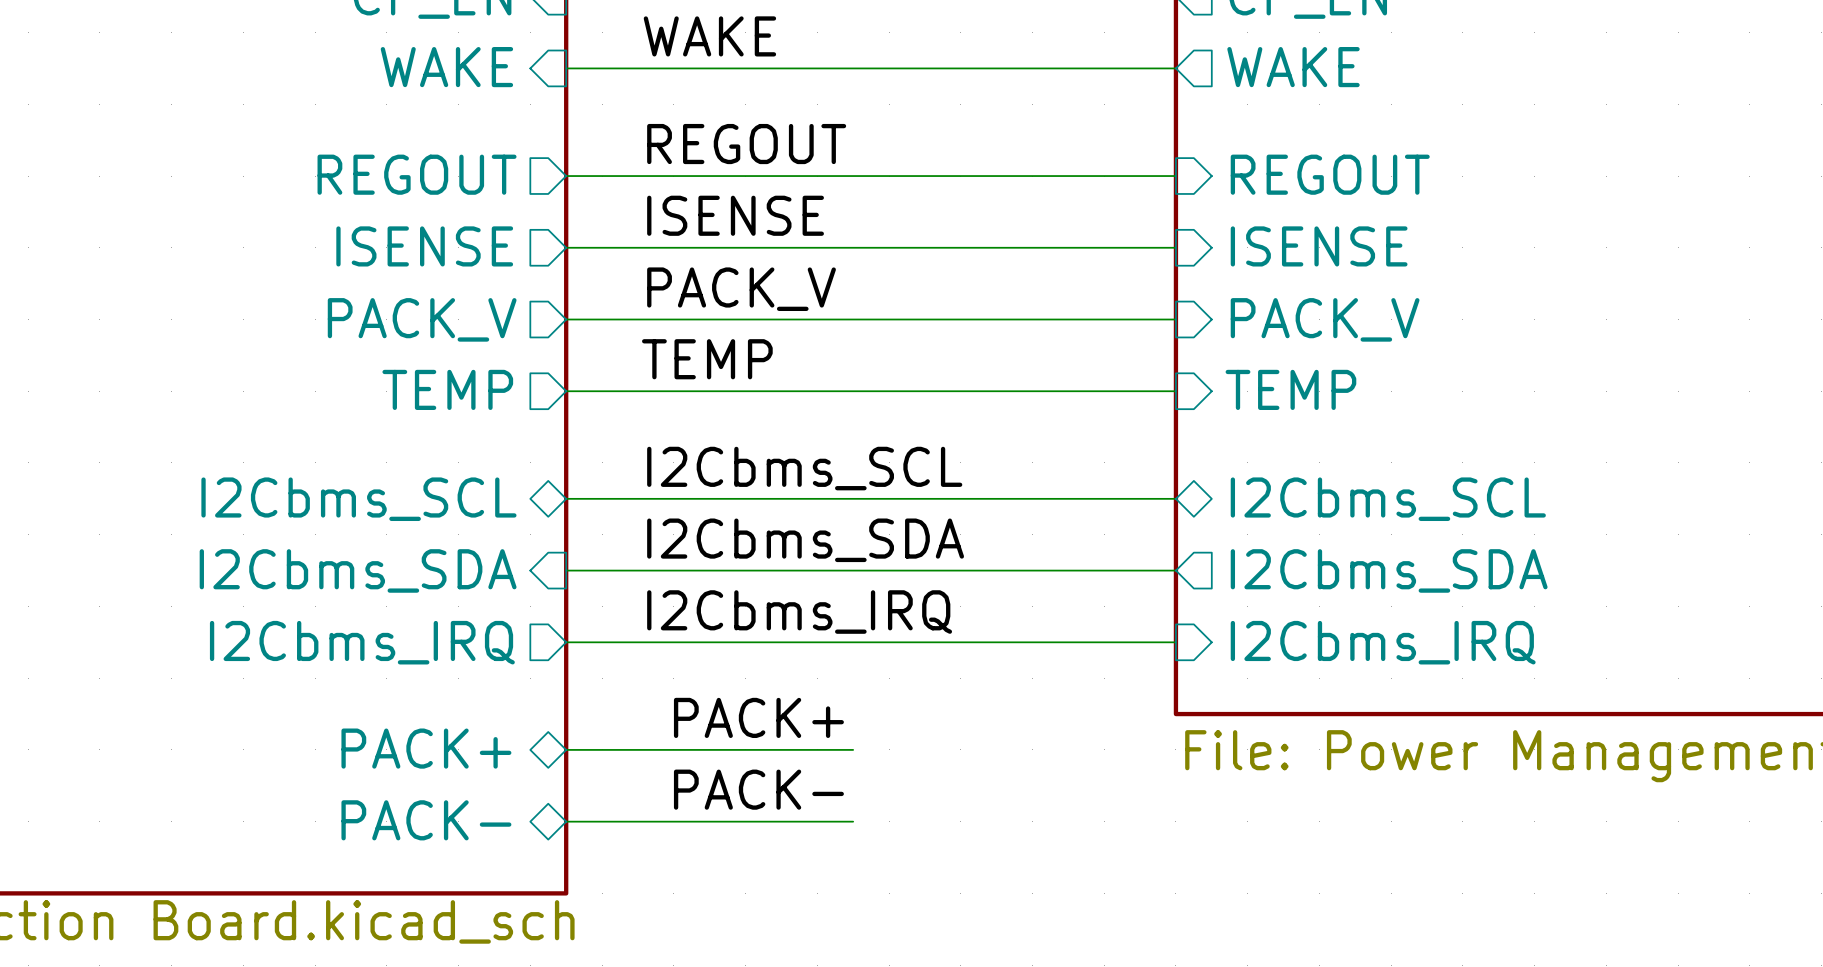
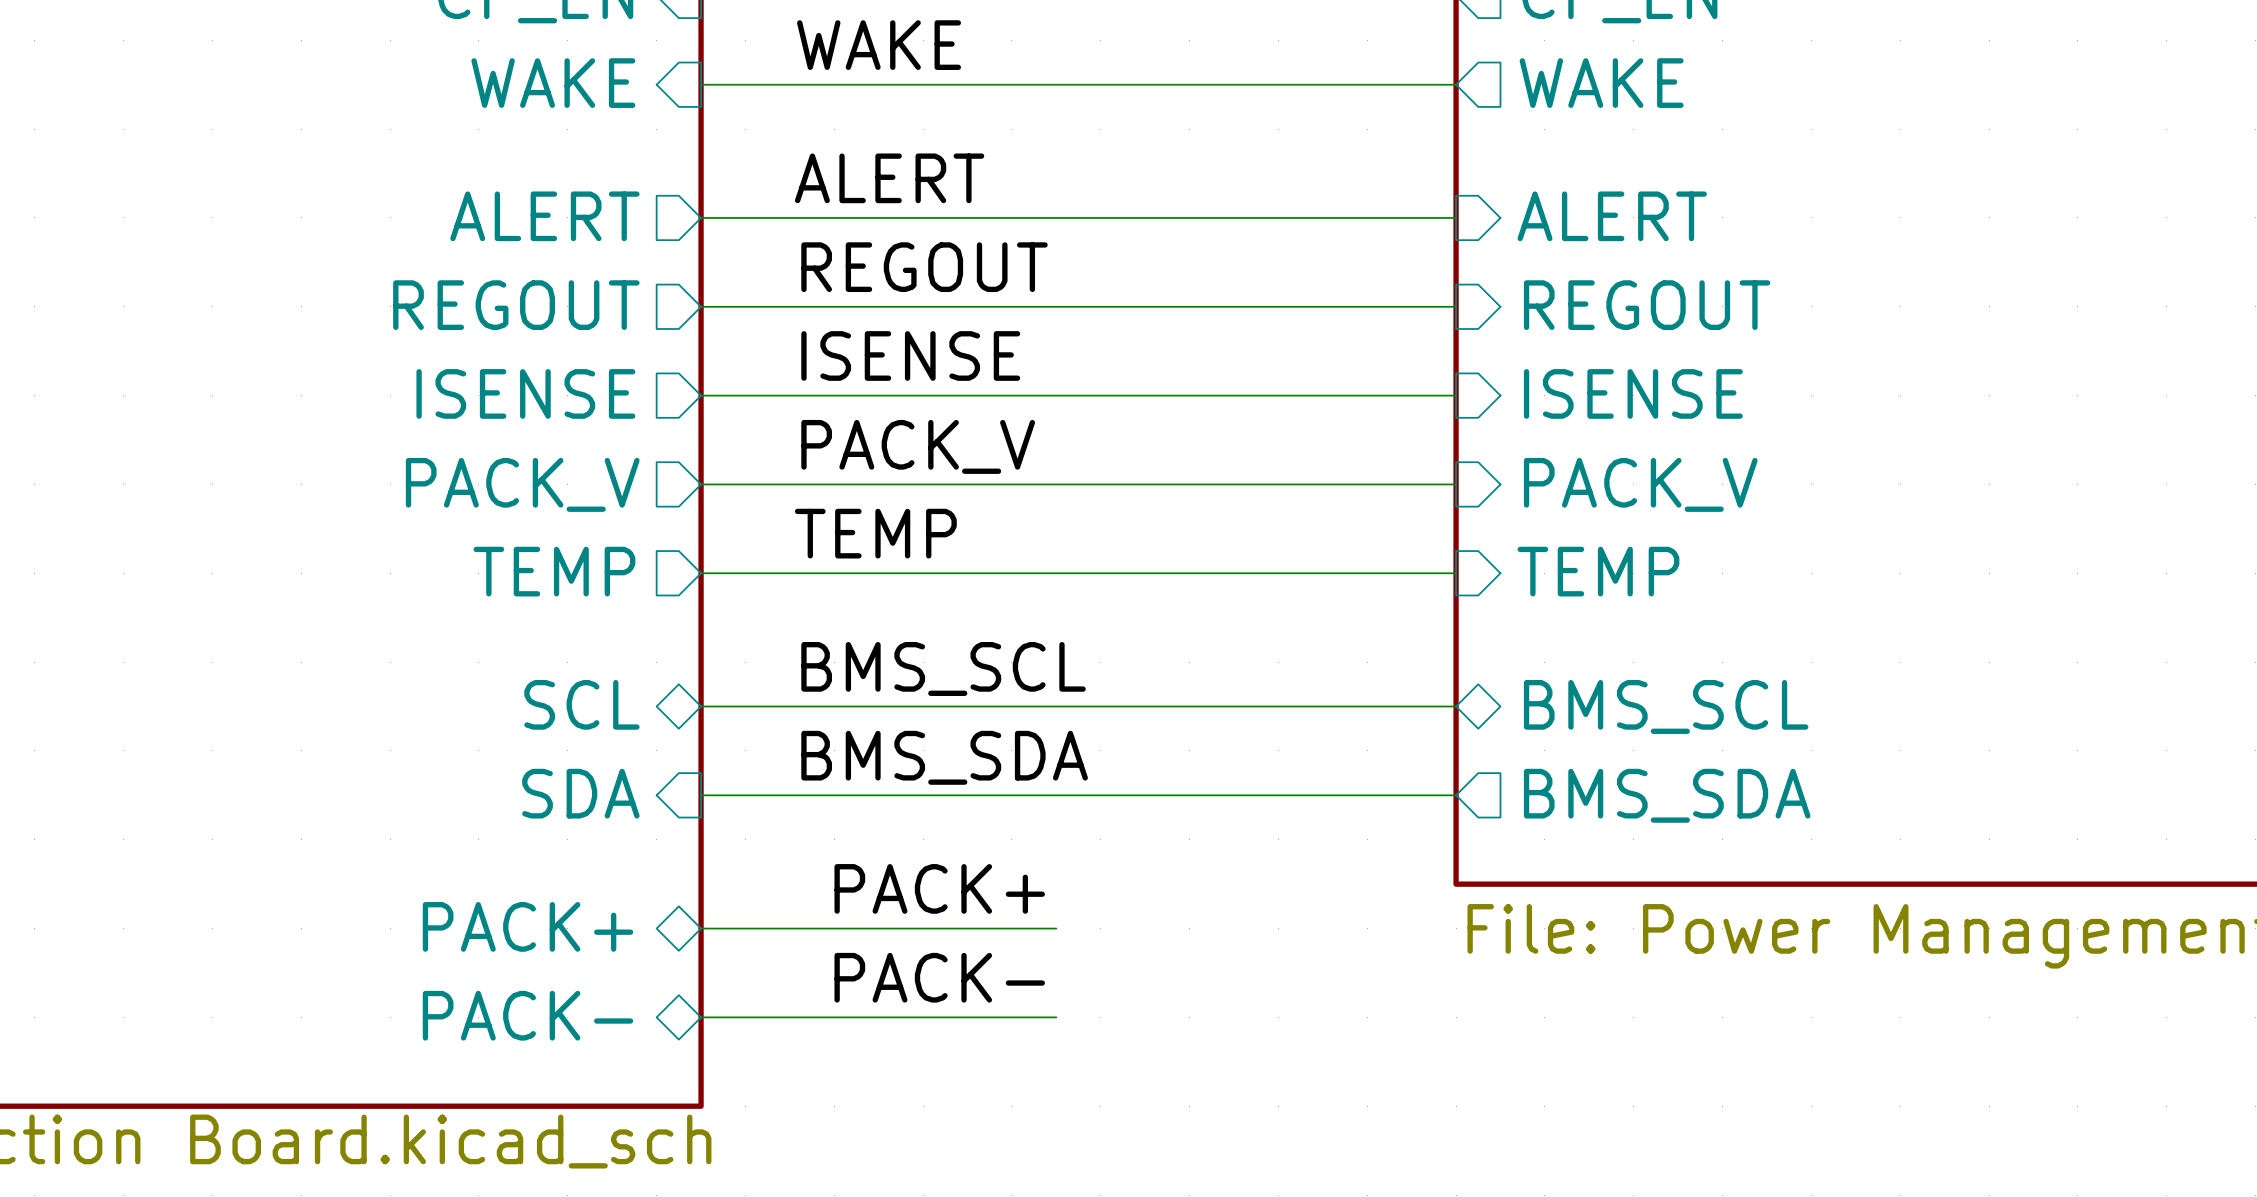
label: REGOUT (746, 144) -> ALERT (889, 178)
sheet pin: REGOUT (417, 174) -> ALERT (544, 216)
sheet pin: REGOUT (1330, 174) -> ALERT (1612, 216)
label: ISENSE (735, 215) -> REGOUT (924, 267)
sheet pin: ISENSE (424, 246) -> REGOUT (516, 305)
sheet pin: ISENSE (1319, 246) -> REGOUT (1647, 305)
label: PACK_V (741, 289) -> ISENSE (910, 355)
sheet pin: PACK_V (422, 319) -> ISENSE (525, 393)
sheet pin: PACK_V (1325, 319) -> ISENSE (1633, 393)
label: TEMP (707, 359) -> PACK_V (918, 446)
sheet pin: TEMP (447, 389) -> PACK_V (522, 484)
sheet pin: TEMP (1290, 389) -> PACK_V (1640, 484)
label: none -> TEMP (875, 533)
sheet pin: none -> TEMP (554, 571)
sheet pin: none -> TEMP (1598, 571)
label: I2Cbms_SCL (804, 468) -> none
wire: (566, 498) (1175, 498) -> (701, 573) (1456, 573)
sheet pin: I2Cbms_SCL (358, 499) -> none
sheet pin: I2Cbms_SCL (1388, 499) -> none
label: I2Cbms_SDA (805, 540) -> BMS_SCL (943, 668)
sheet pin shape: input (358, 570) -> bidirectional (581, 704)
sheet pin: I2Cbms_SDA (358, 570) -> SCL (581, 704)
sheet pin shape: output (1389, 570) -> bidirectional (1666, 706)
sheet pin: I2Cbms_SDA (1389, 570) -> BMS_SCL (1666, 706)
label: I2Cbms_IRQ (799, 612) -> BMS_SDA (944, 757)
sheet pin shape: output (362, 642) -> input (580, 793)
sheet pin: I2Cbms_IRQ (362, 642) -> SDA (580, 793)
sheet pin shape: input (1383, 642) -> output (1667, 795)
sheet pin: I2Cbms_IRQ (1383, 642) -> BMS_SDA (1667, 795)

